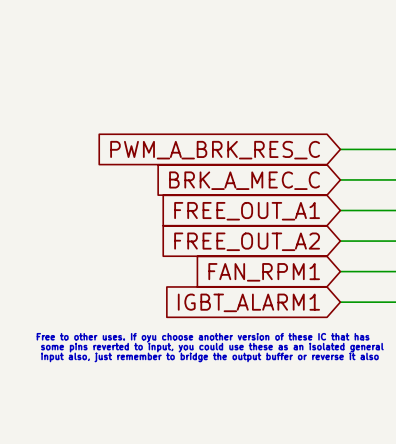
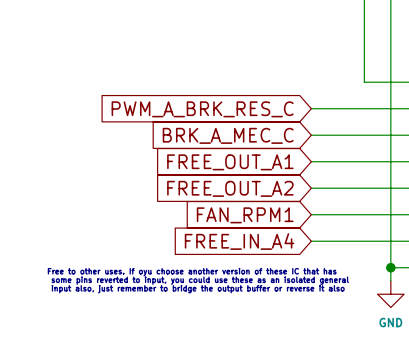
global label: IGBT_ALARM1 (248, 302) -> FREE_IN_A4 (239, 241)

